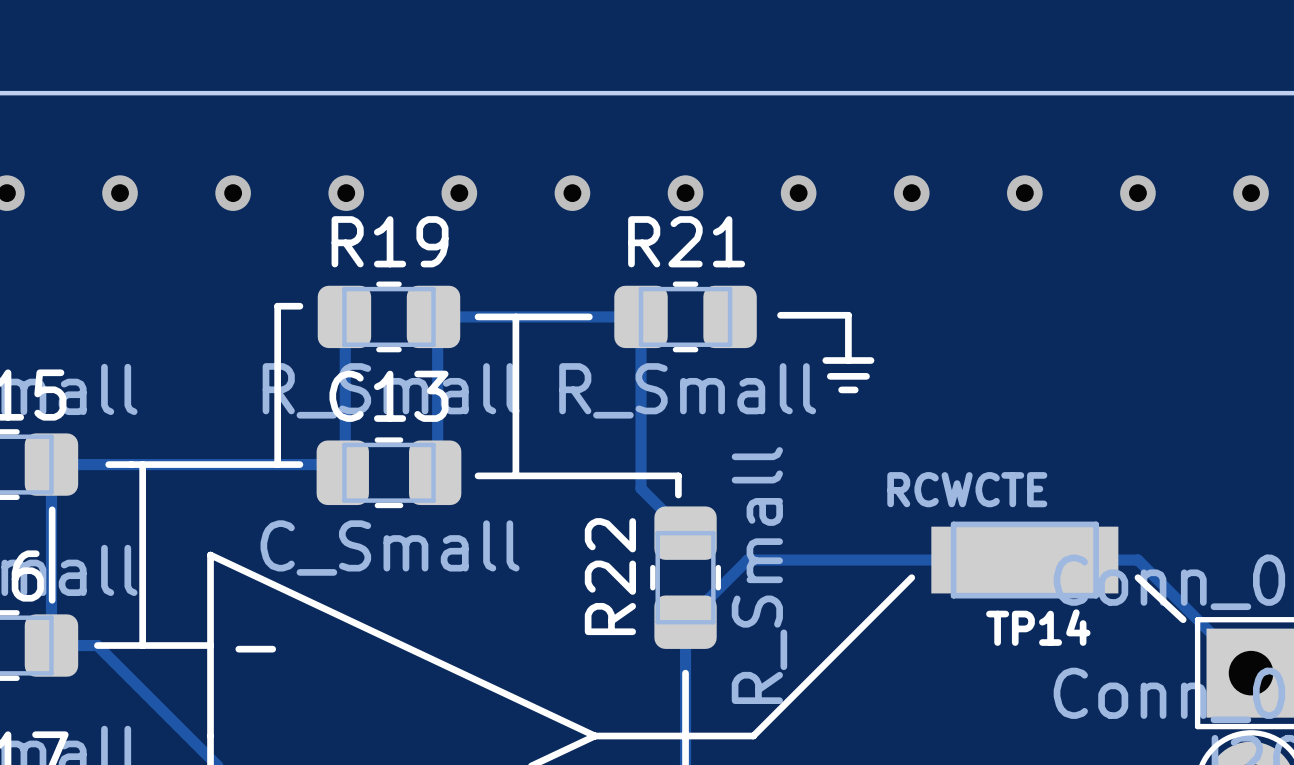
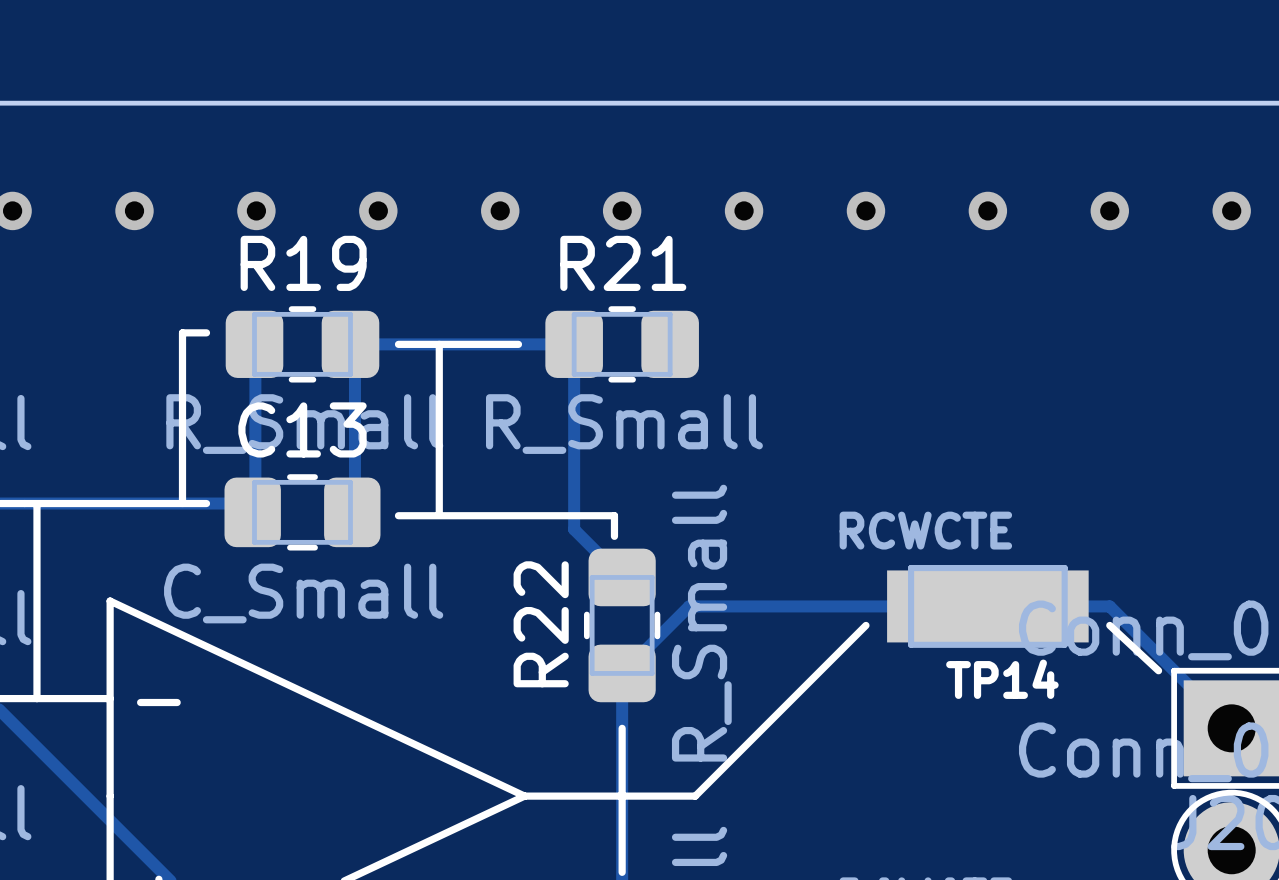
line: (780, 315) (848, 315) (848, 360) -> none
line: (825, 360) (871, 360) -> none
line: (830, 376) (866, 376) -> none
line: (841, 389) (855, 389) -> none

